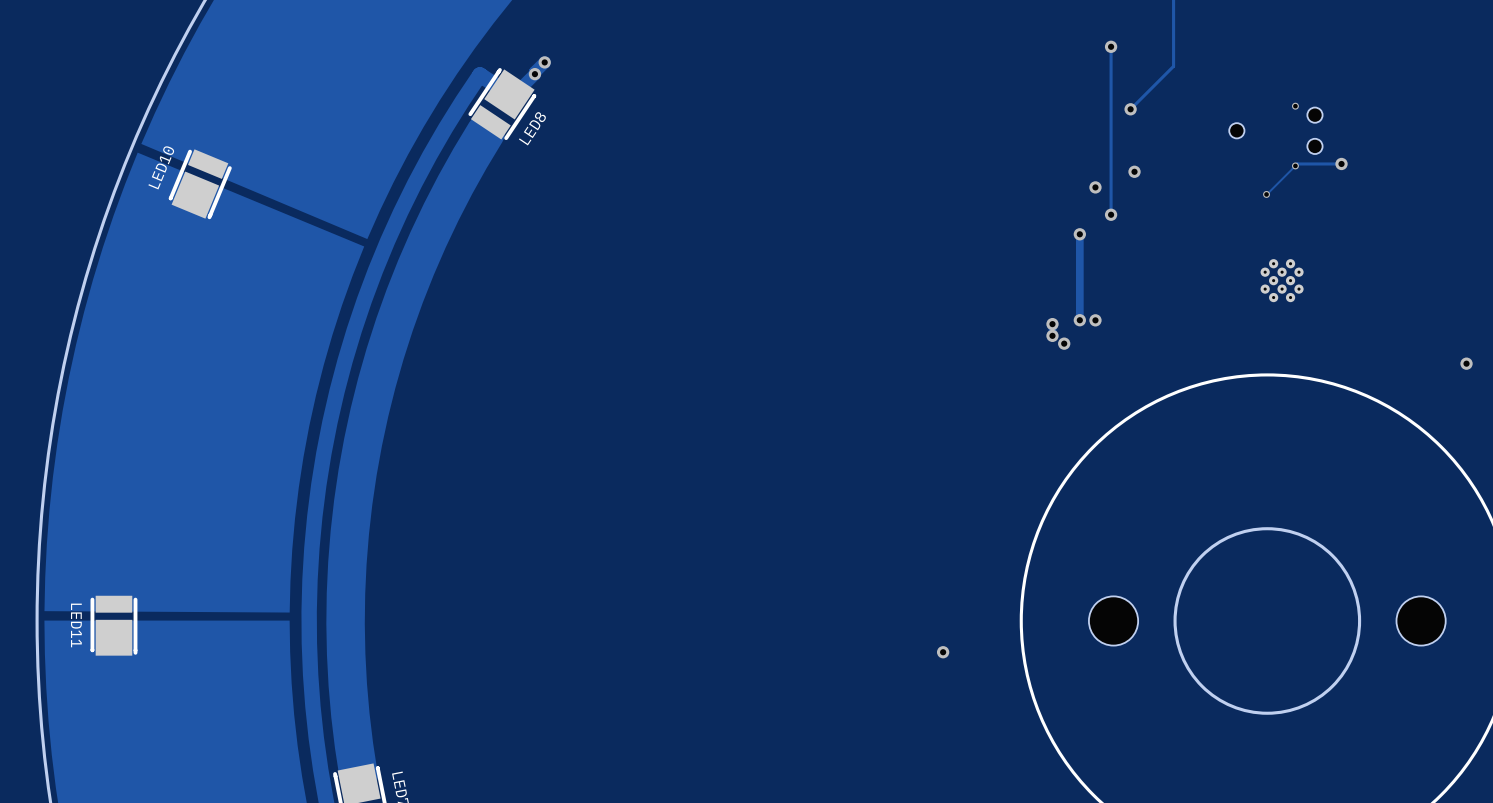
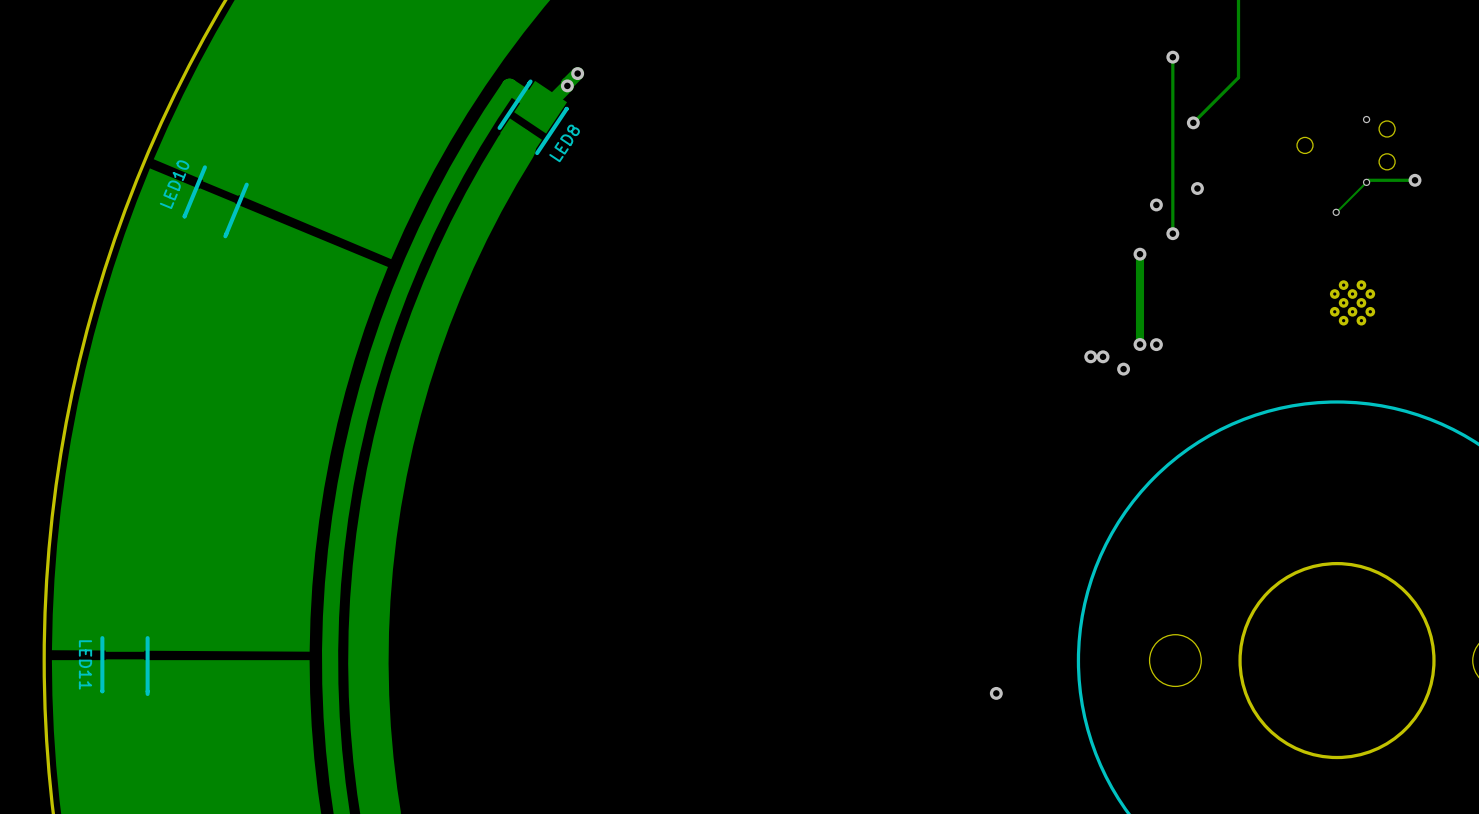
via: (1052, 324) -> none
via: none -> (1090, 356)
via: none -> (1103, 356)
via: (1052, 335) -> none

